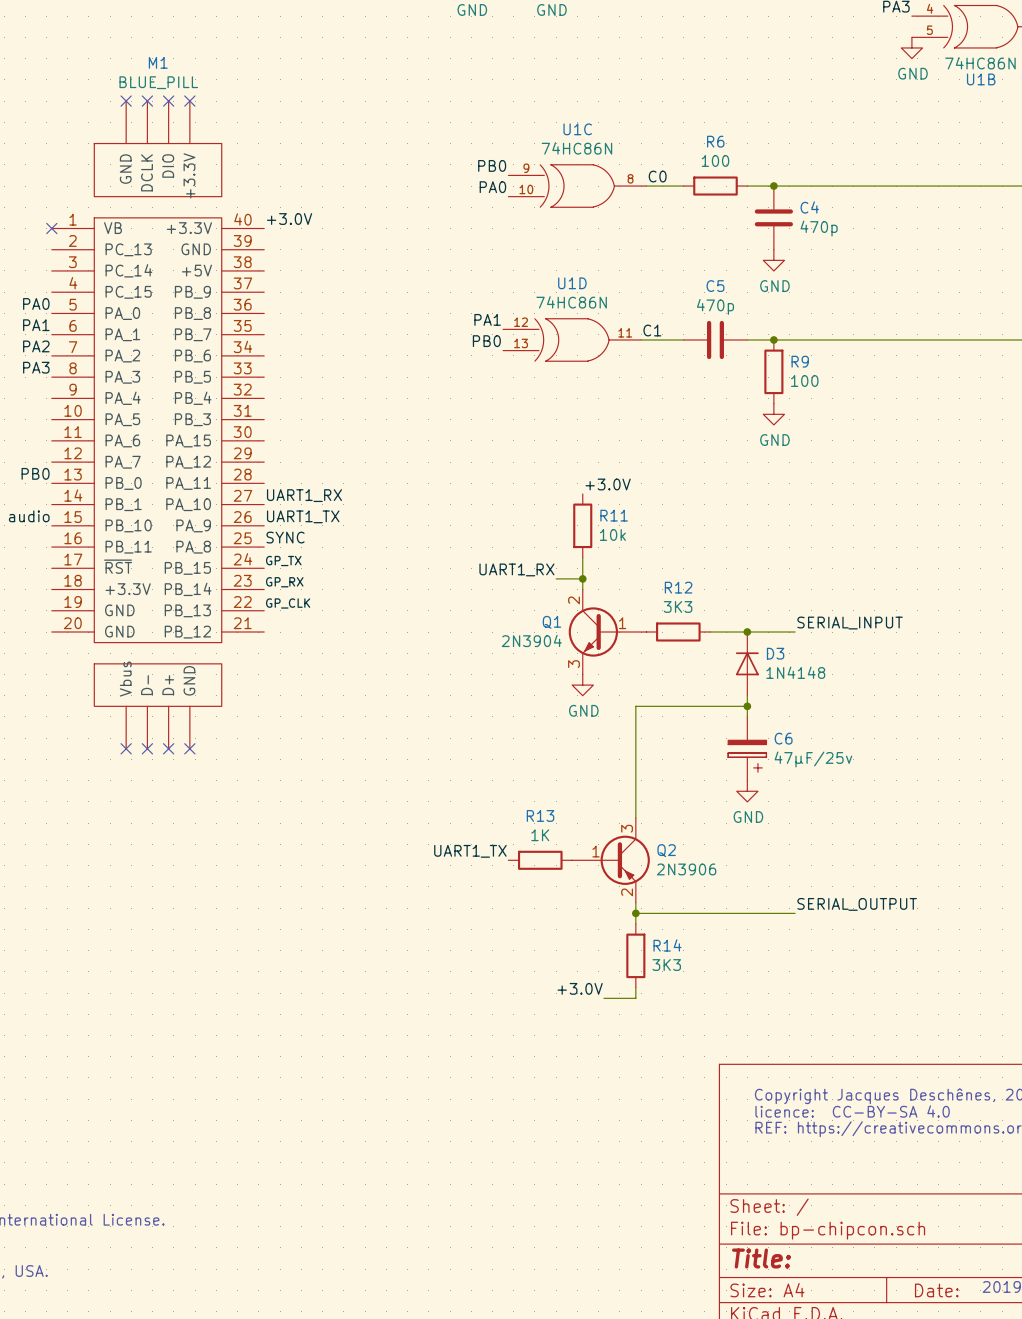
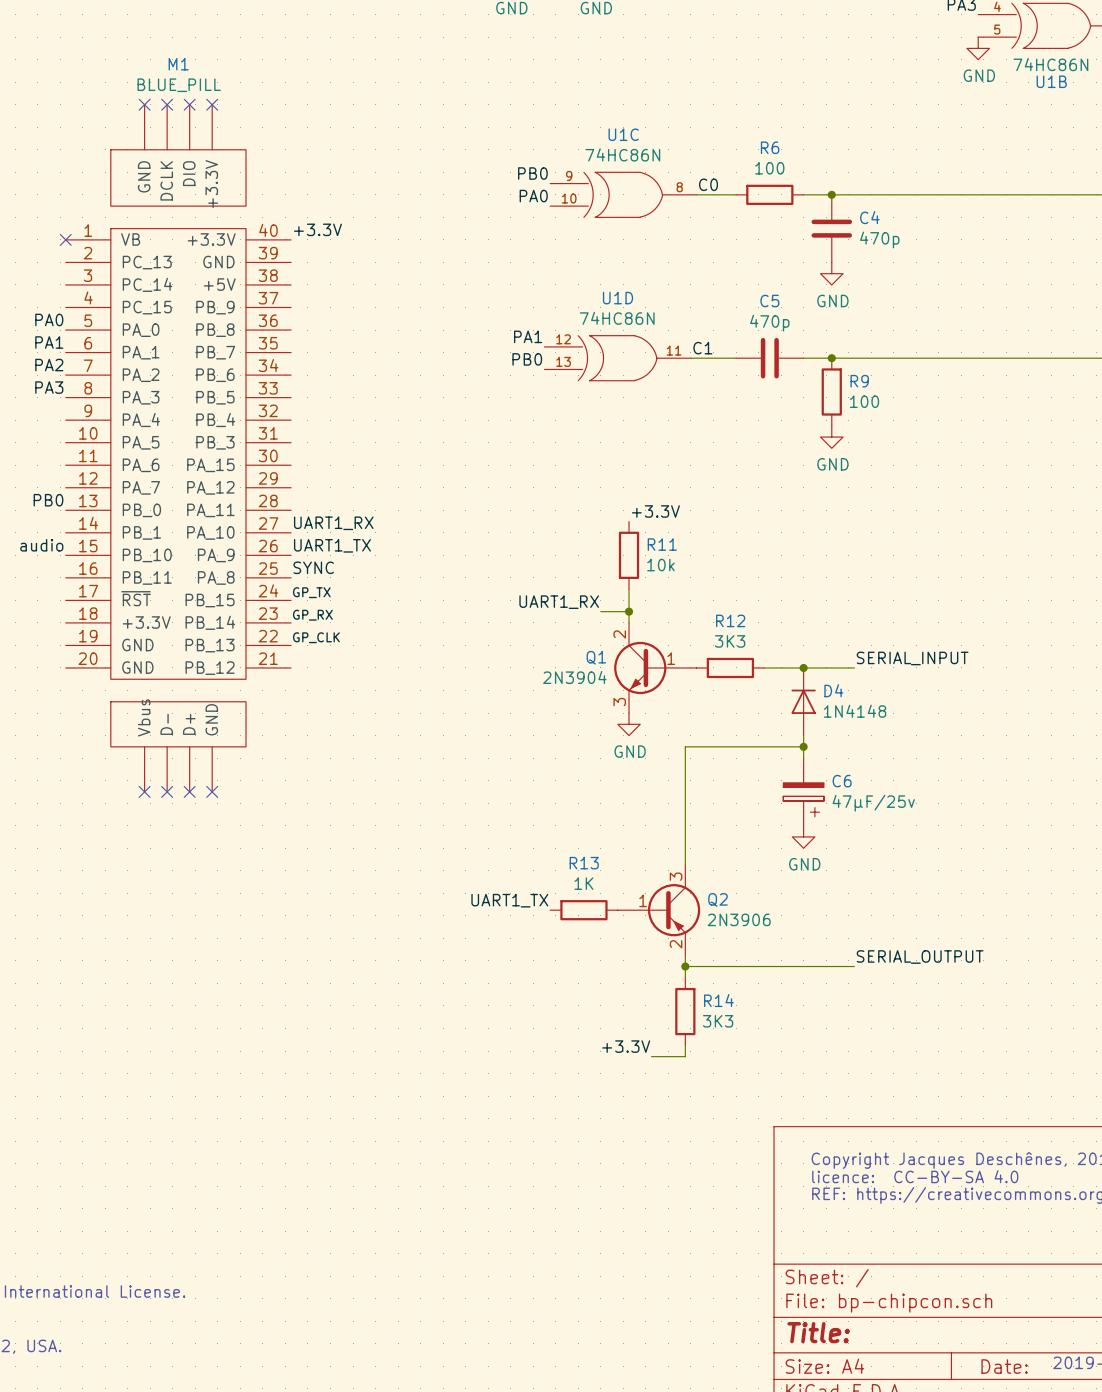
label: +3.0V (289, 219) -> +3.3V (317, 229)
label: +3.0V (608, 484) -> +3.3V (655, 511)
D3 name: D3 (775, 653) -> D4 (833, 690)
label: +3.0V (580, 988) -> +3.3V (626, 1046)

